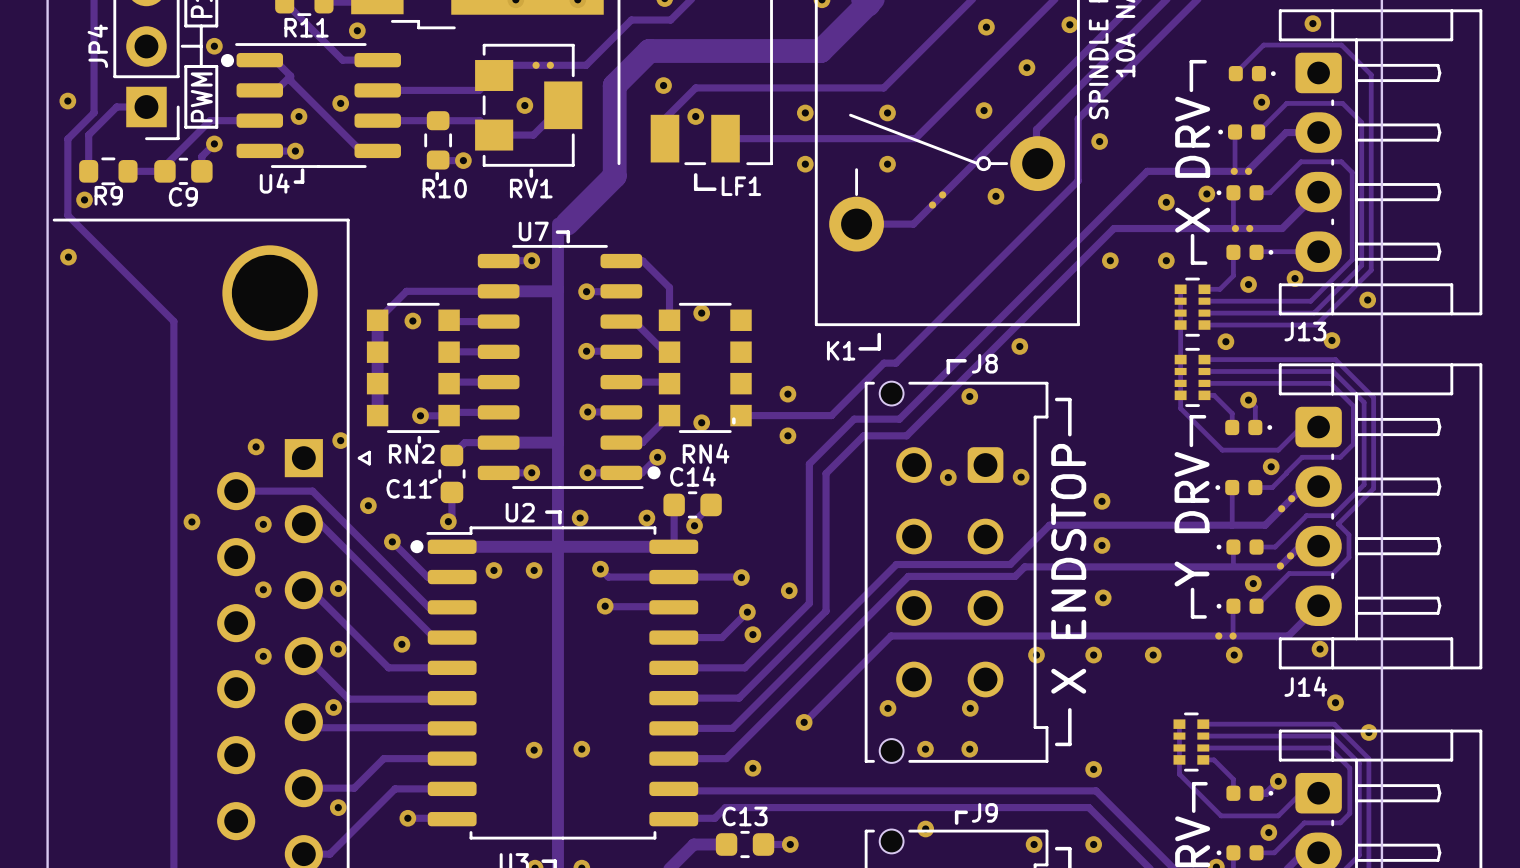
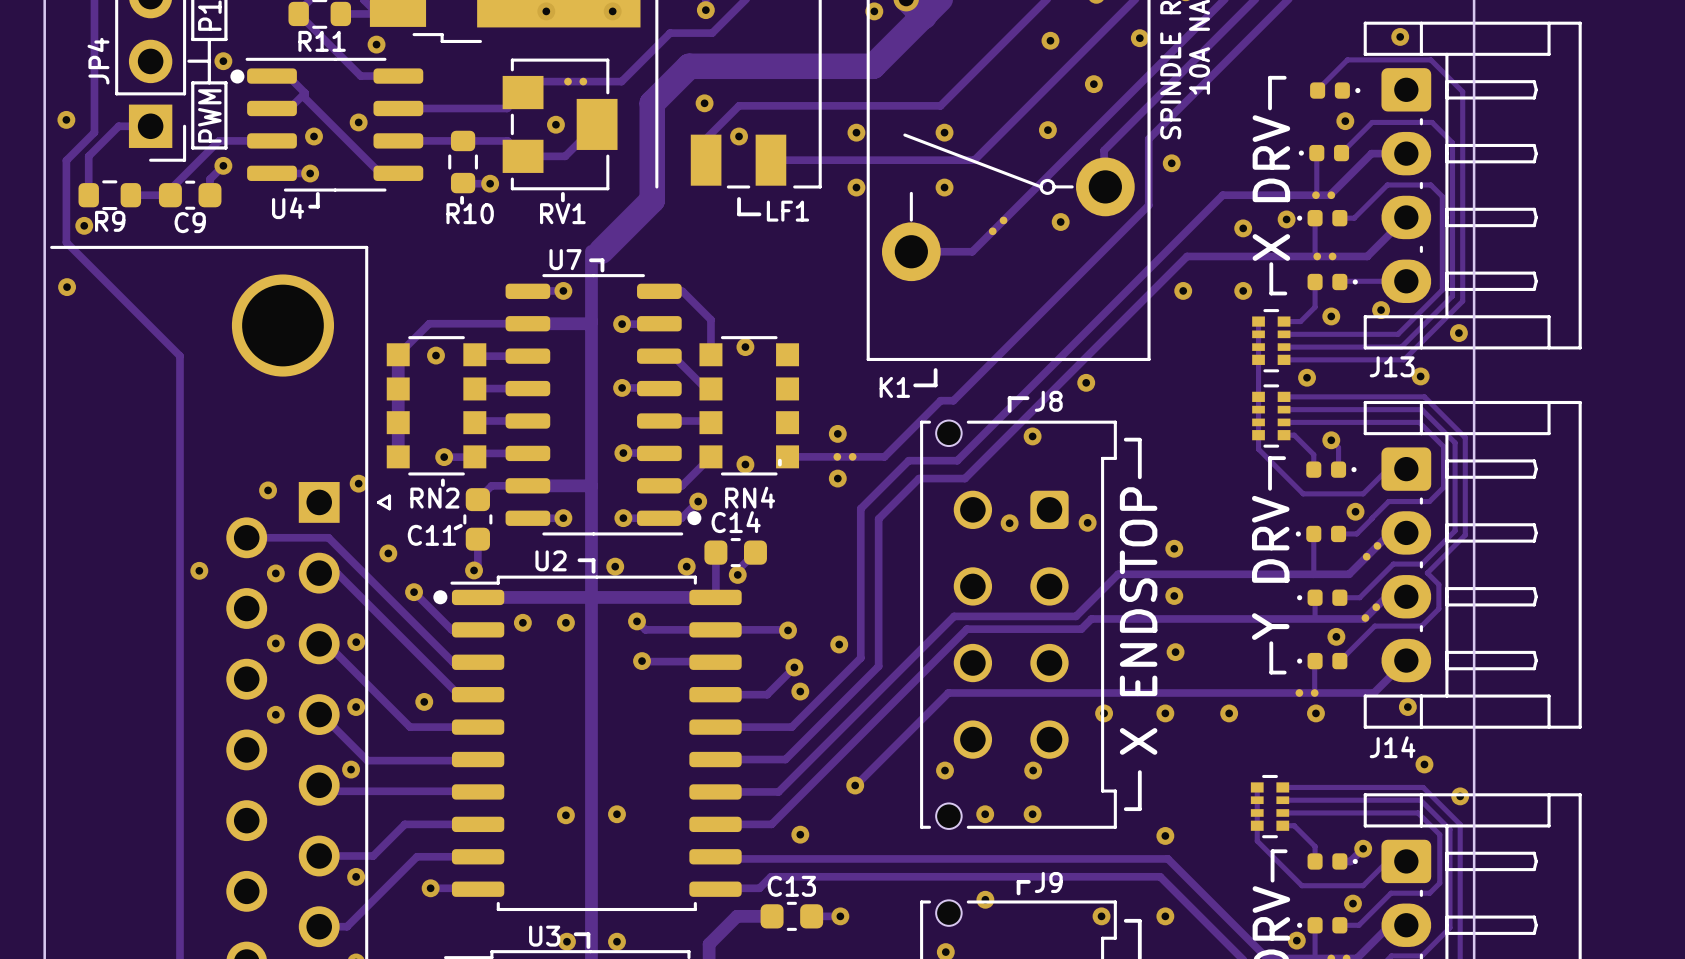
track: (787, 415) (801, 415) -> none
part: none -> (844, 456)

